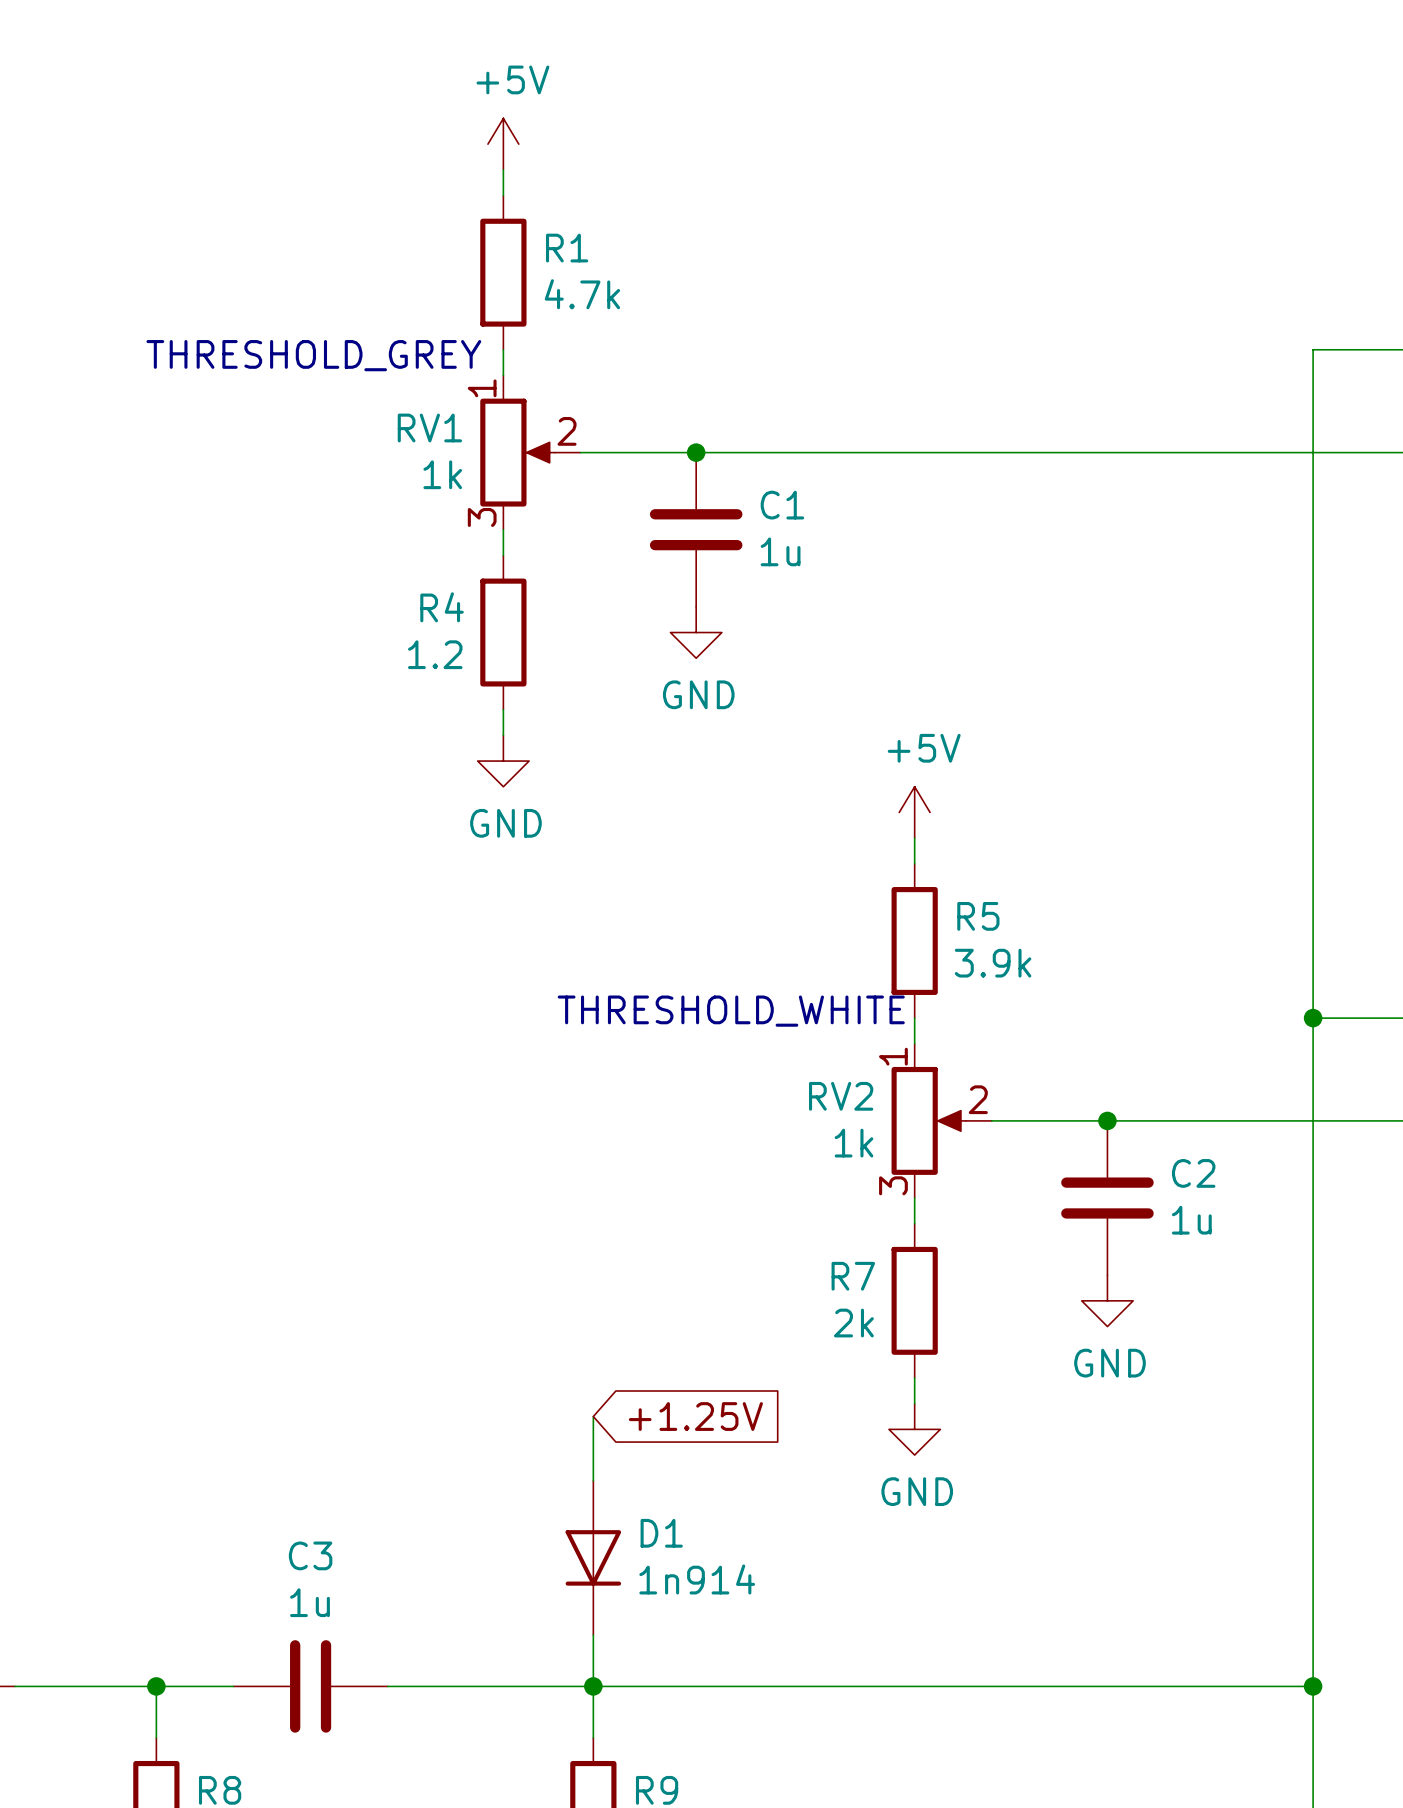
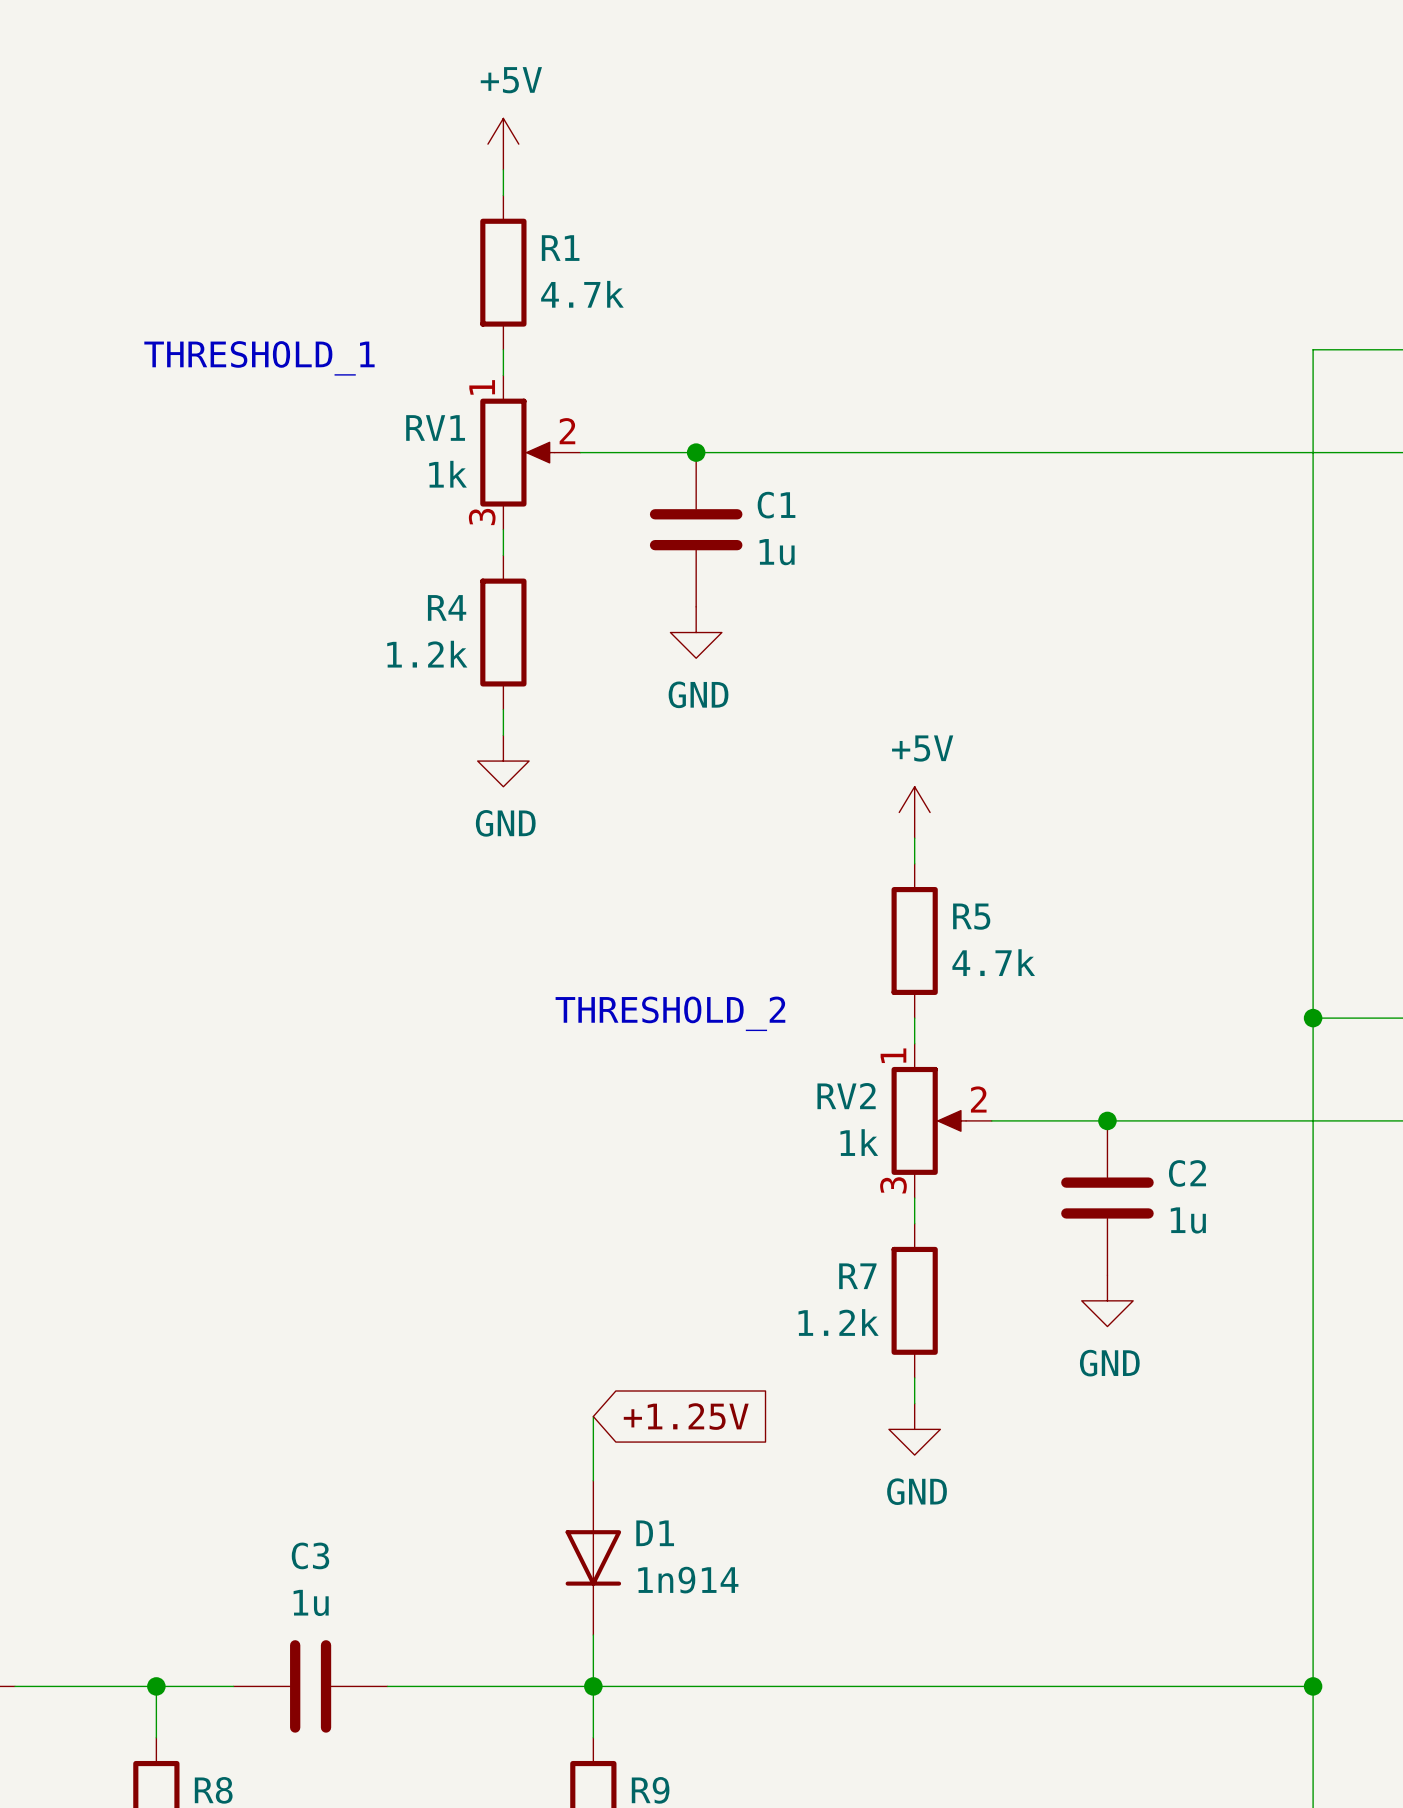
text: THRESHOLD_GREY (313, 355) -> THRESHOLD_1 (259, 358)
R4 value: 1.2 (435, 654) -> 1.2k (427, 654)
R5 value: 3.9k (993, 963) -> 4.7k (993, 962)
text: THRESHOLD_WHITE (731, 1011) -> THRESHOLD_2 (670, 1013)
R7 value: 2k (853, 1323) -> 1.2k (838, 1322)

